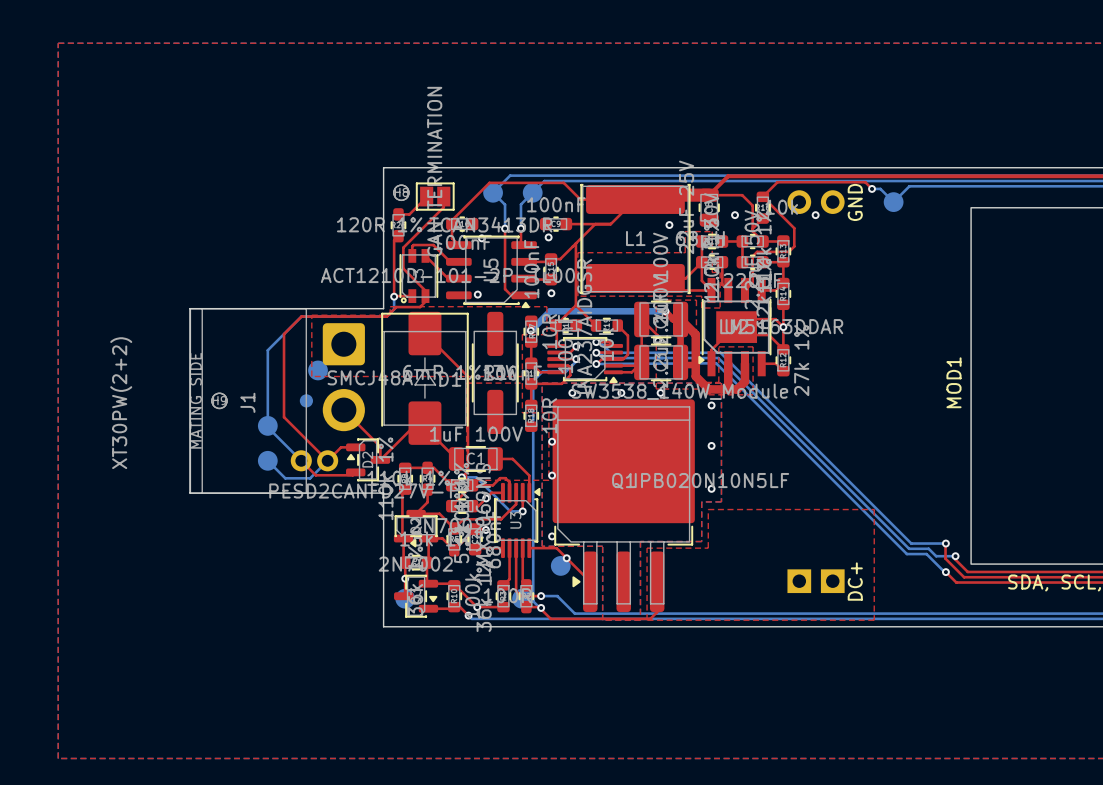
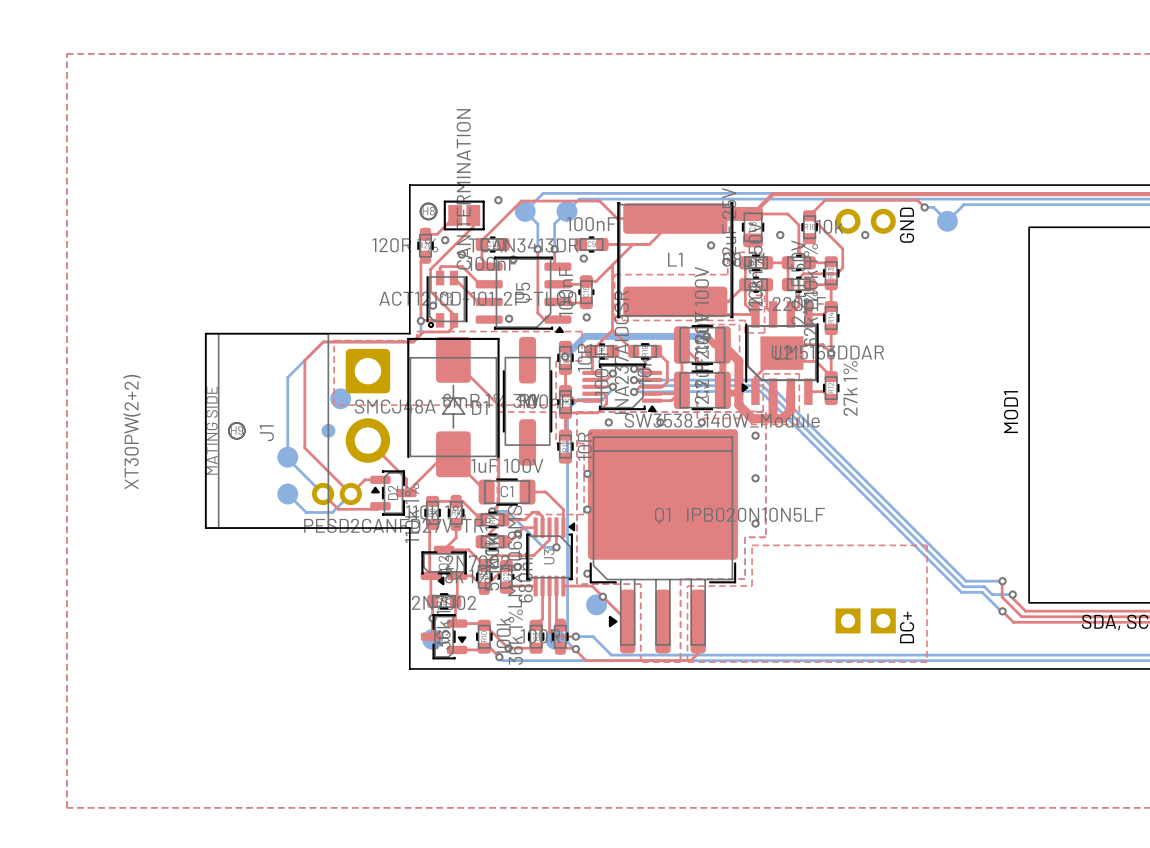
via: none -> (498, 200)
via: none -> (445, 240)
via: none -> (461, 254)
via: none -> (433, 305)

